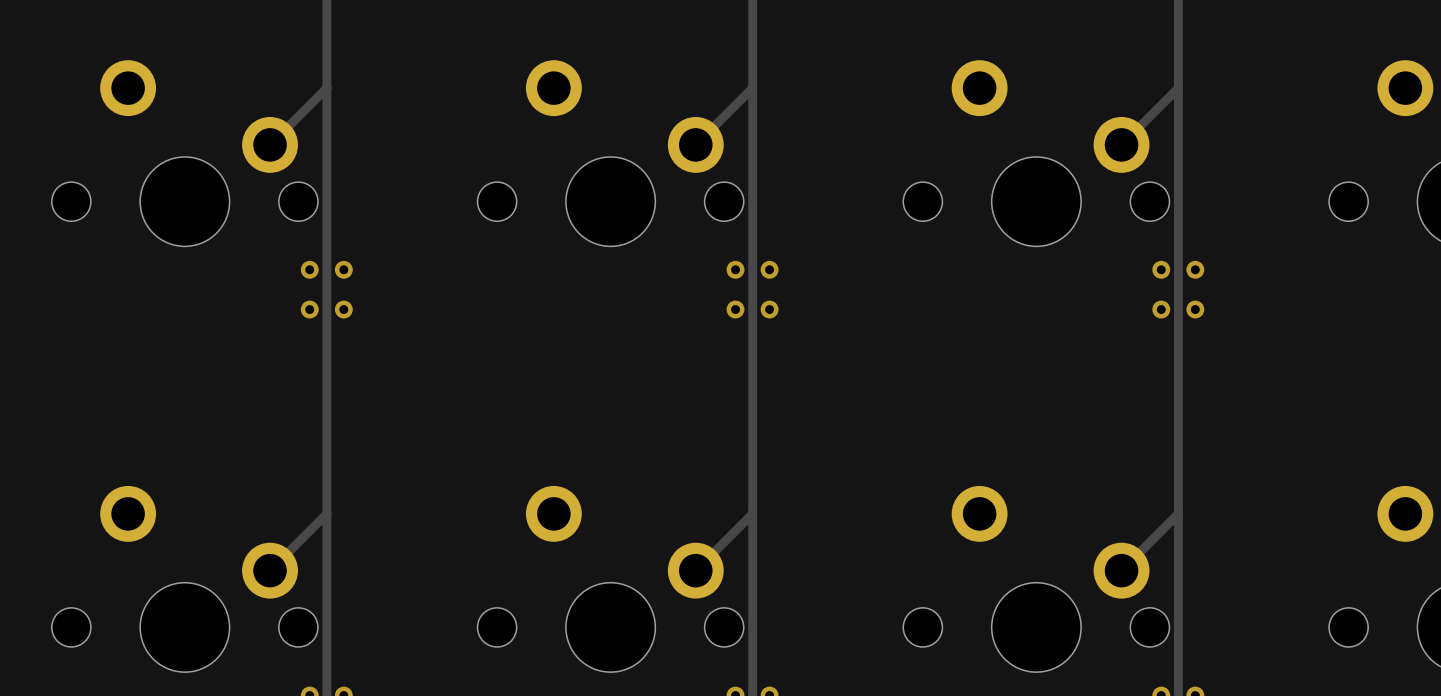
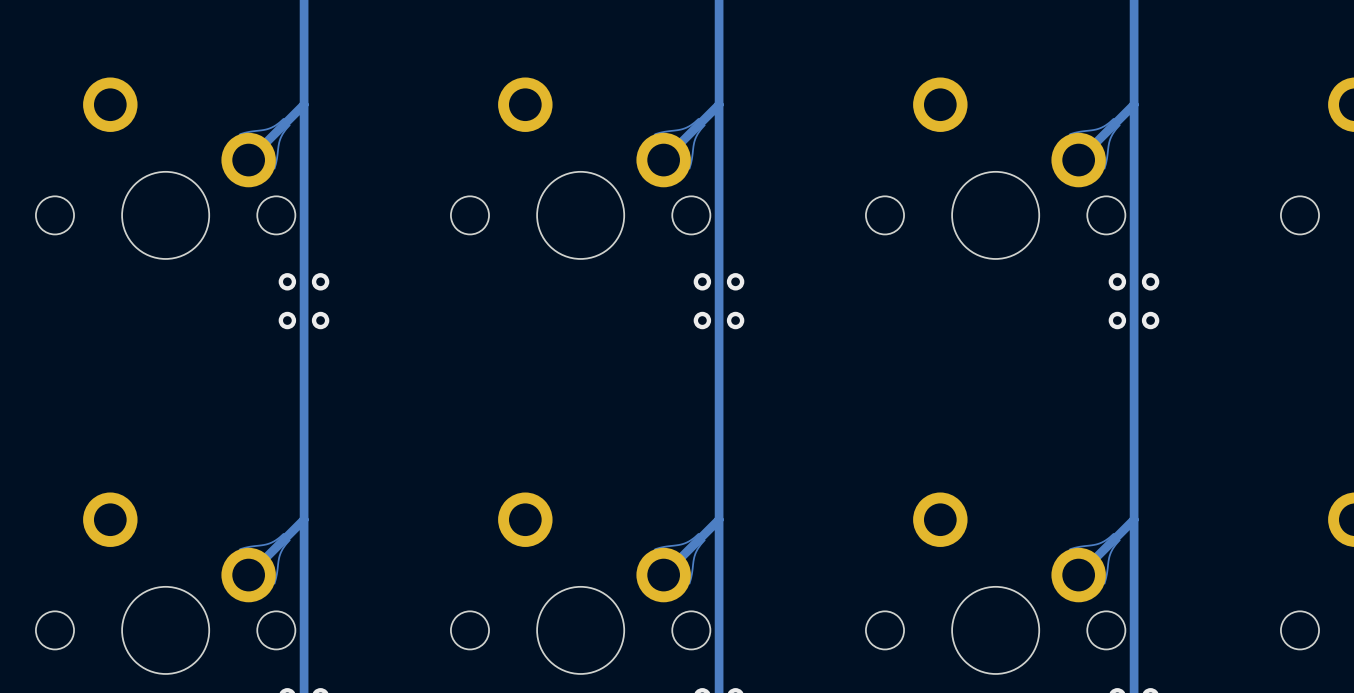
zone outline: none -> (283, 118) (290, 124) (280, 137) (274, 168) (239, 169) (239, 134) (270, 128) (283, 118)
zone outline: none -> (698, 118) (705, 124) (695, 137) (689, 168) (654, 169) (654, 134) (685, 128) (698, 118)
zone outline: none -> (1113, 118) (1100, 128) (1069, 134) (1069, 169) (1104, 168) (1110, 137) (1120, 124) (1113, 118)
zone outline: none -> (283, 533) (270, 543) (239, 549) (239, 584) (274, 583) (280, 552) (290, 539) (283, 533)
zone outline: none -> (698, 533) (685, 543) (654, 549) (654, 584) (689, 583) (695, 552) (705, 539) (698, 533)
zone outline: none -> (1113, 533) (1100, 543) (1069, 549) (1069, 584) (1104, 583) (1110, 552) (1120, 539) (1113, 533)

